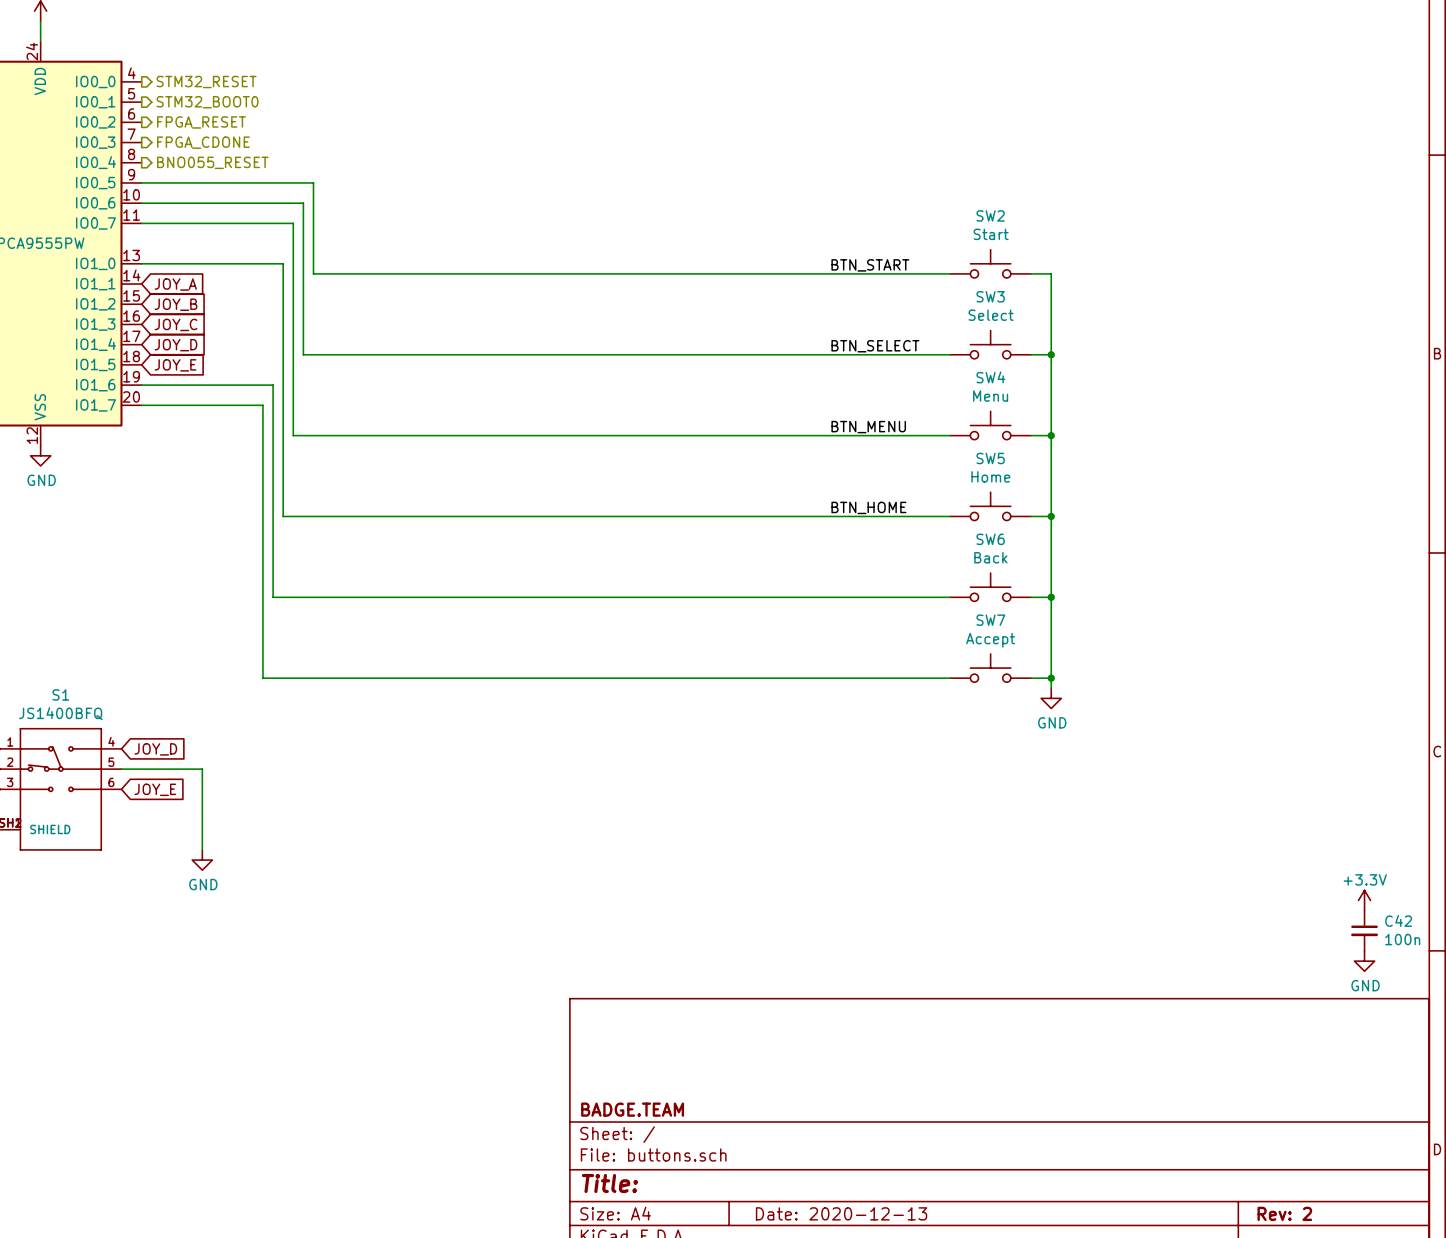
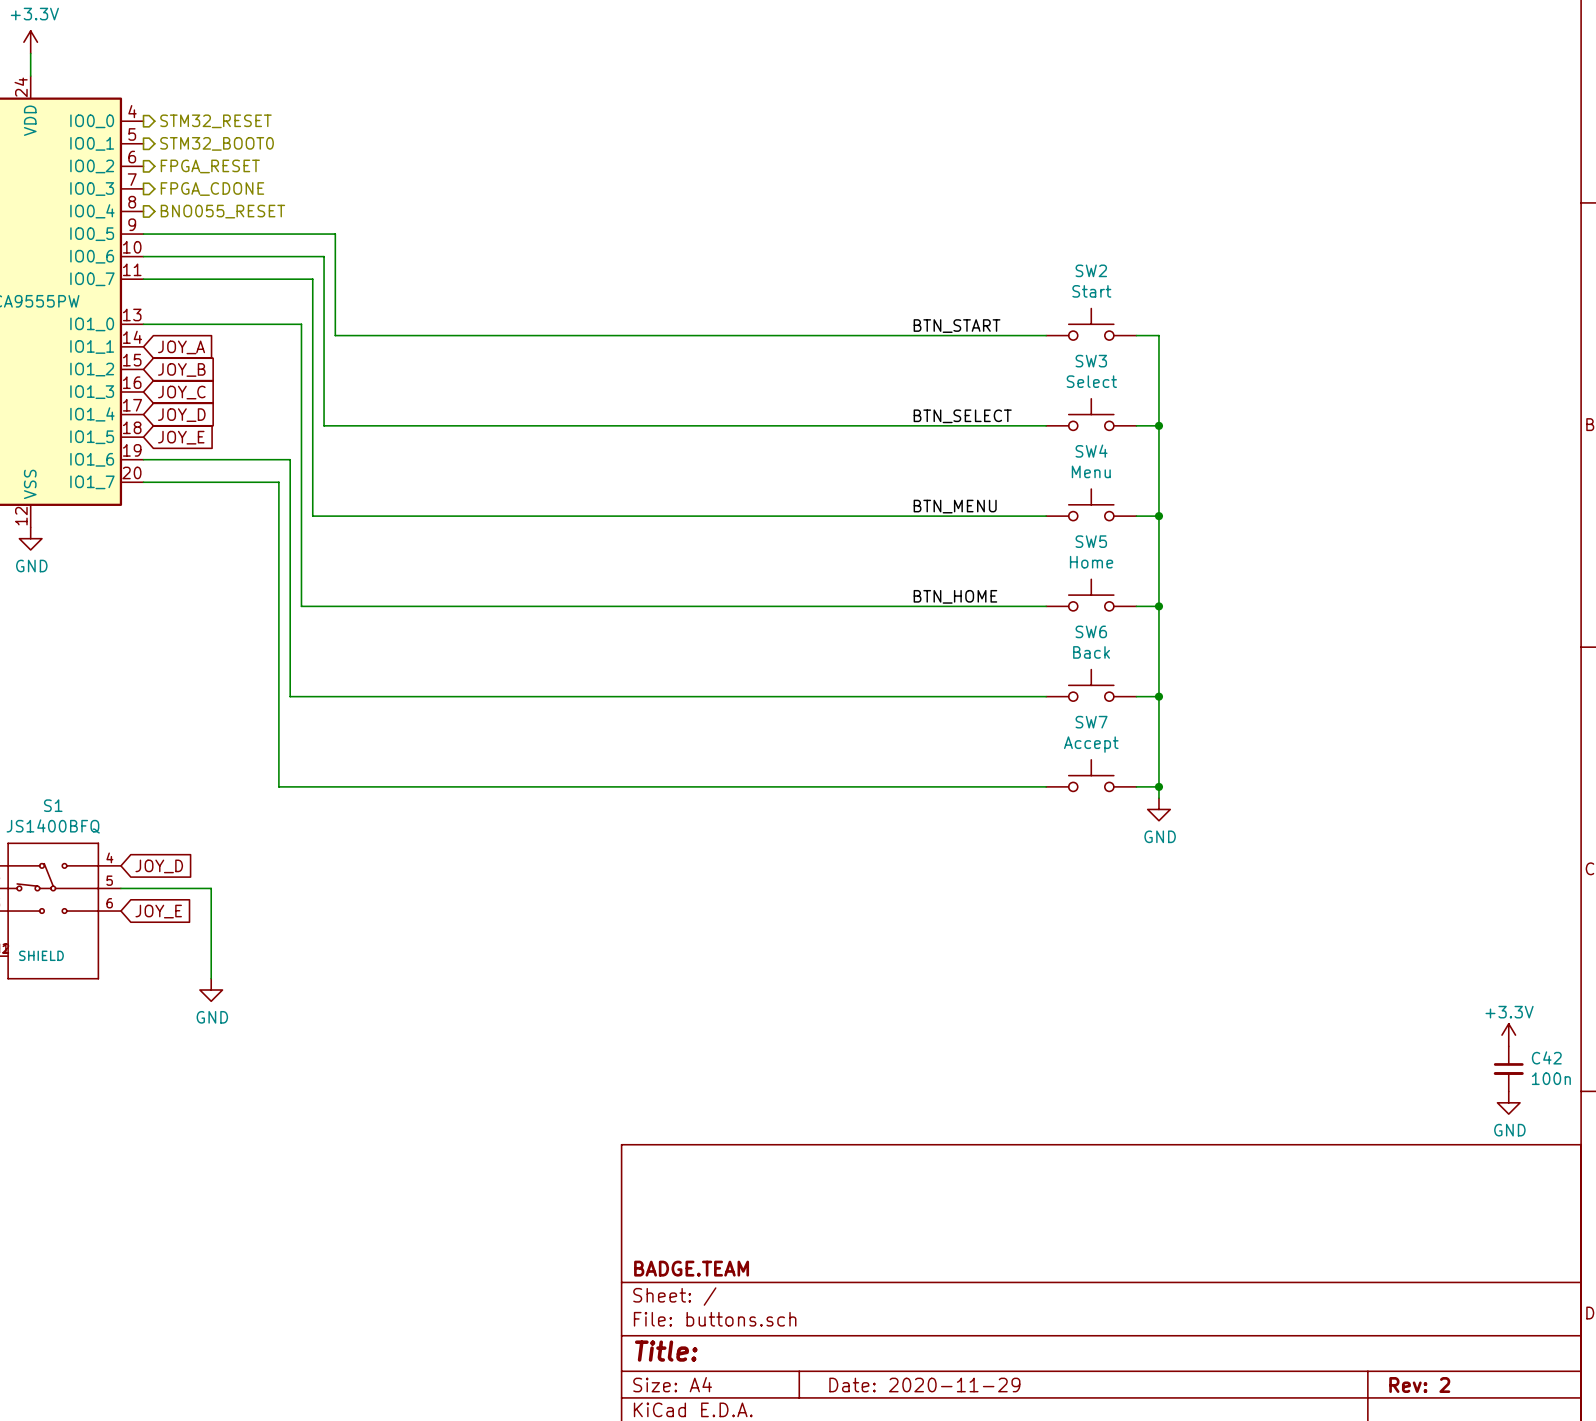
title block: Date: 2020-12-13 (841, 1213) -> Date: 2020-11-29 (924, 1385)

